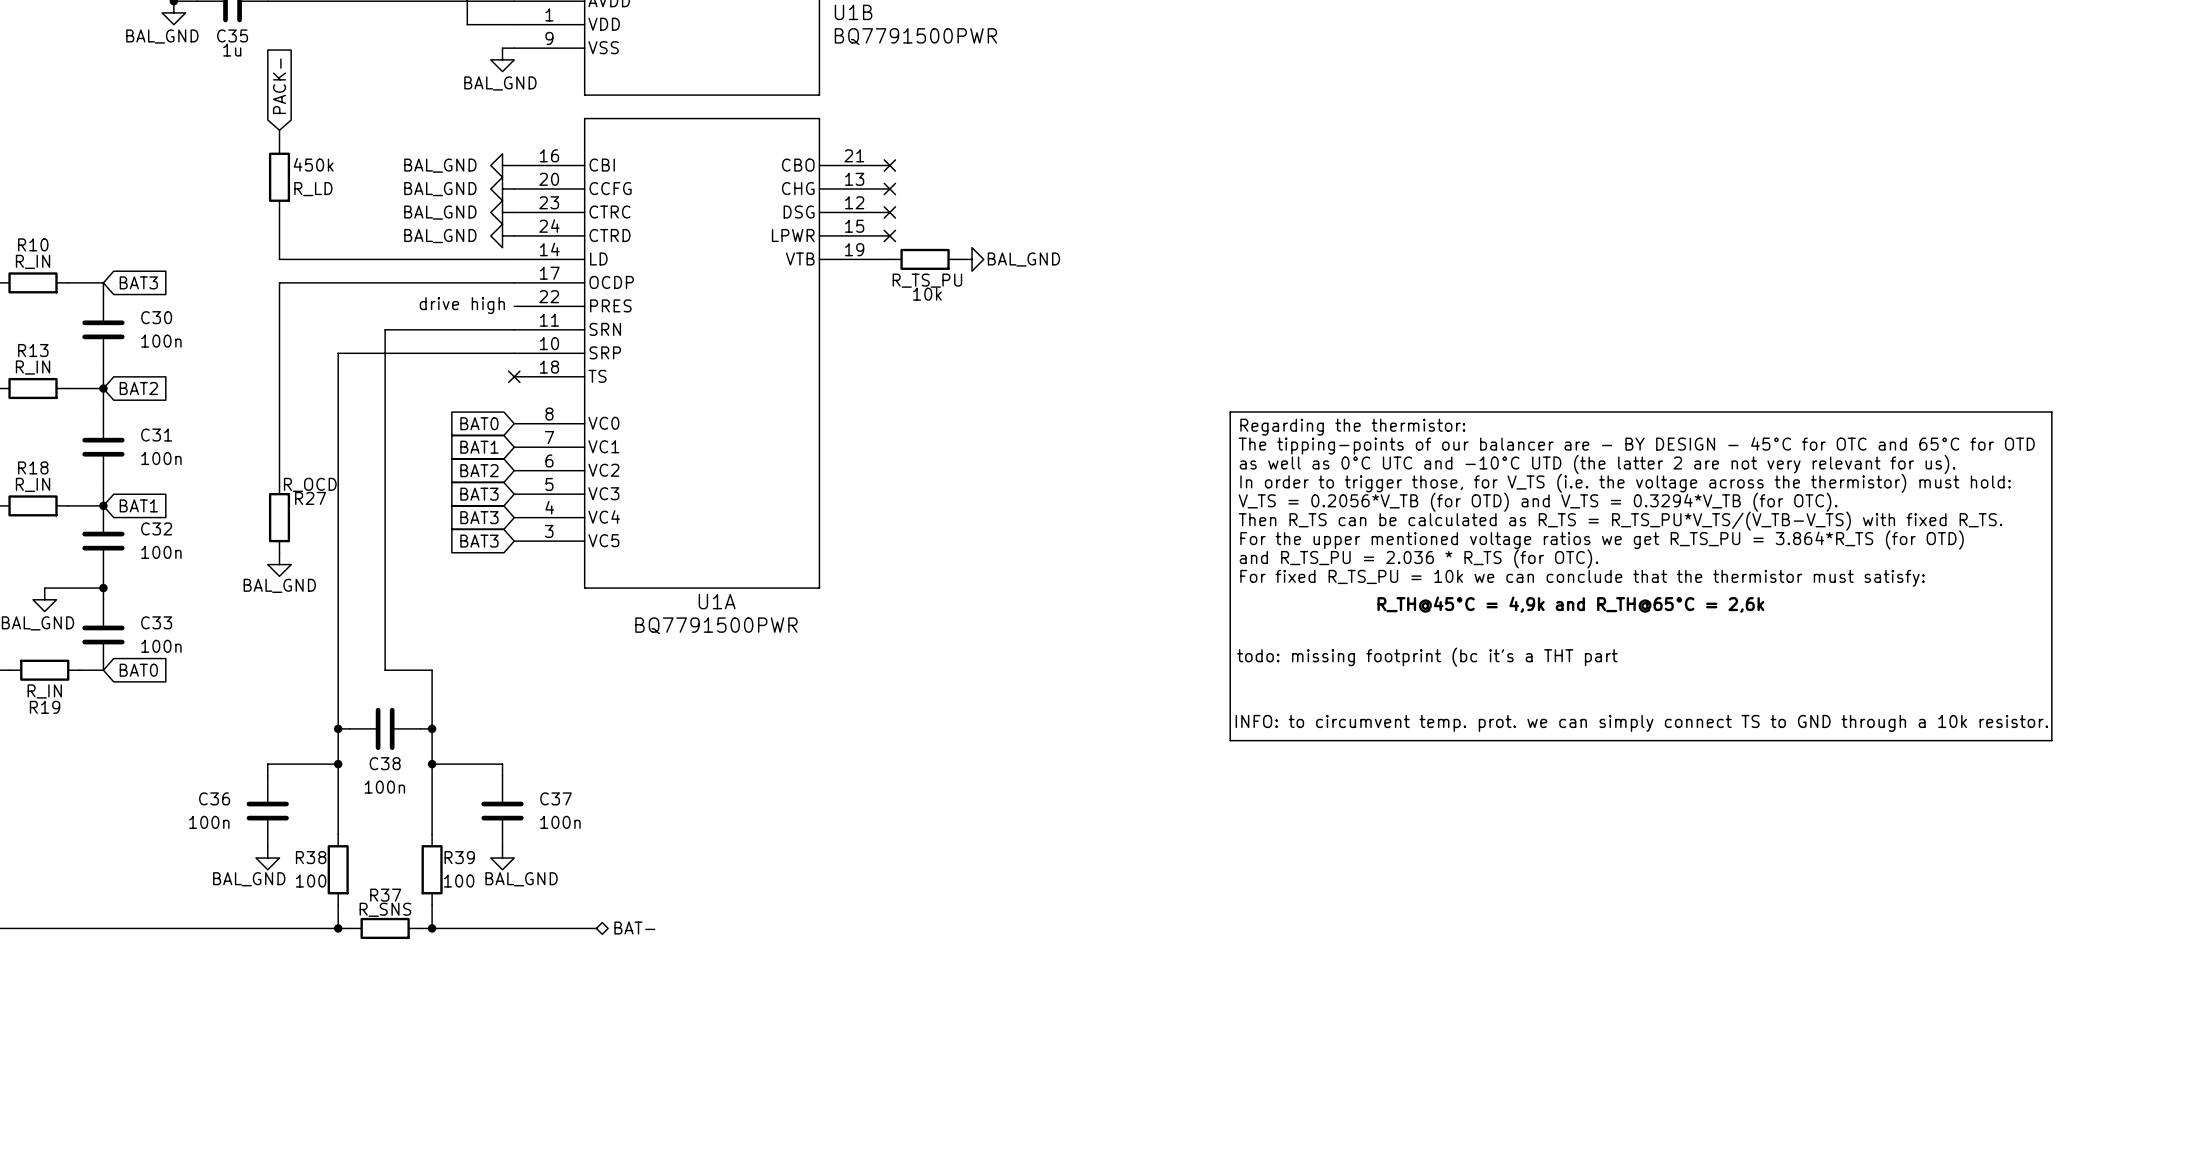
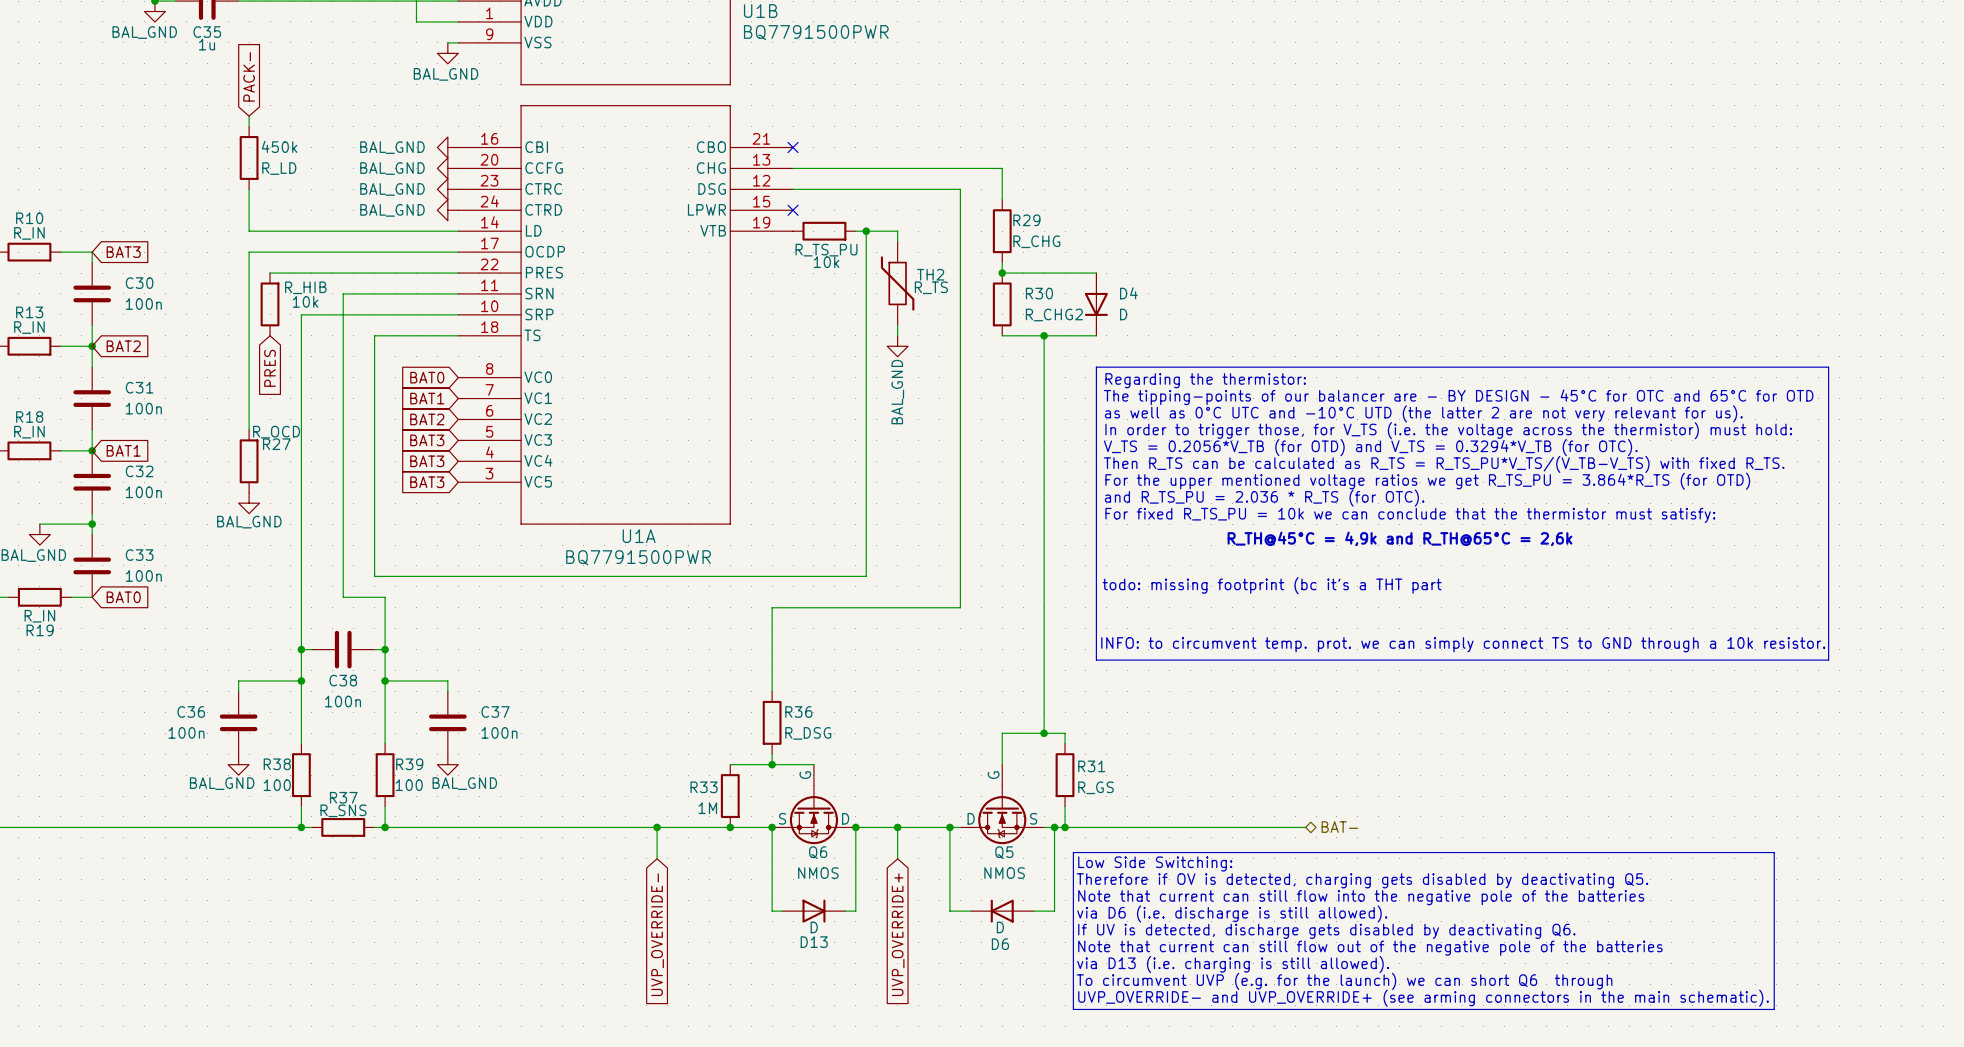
wire: none -> (793, 168) (1002, 168) (1002, 199)
no-connect mark: (889, 188) -> none
wire: none -> (793, 189) (960, 189) (960, 607) (772, 607) (772, 691)
no-connect mark: (889, 212) -> none
wire: none -> (855, 231) (897, 231) (897, 241)
wire: none -> (866, 231) (866, 576) (374, 576) (374, 335) (458, 335)
power symbol rotation: 0° (972, 259) -> 90° clockwise (897, 346)
power symbol position: BAL_GND (972, 259) -> BAL_GND (897, 346)
junction: none -> (866, 231)
R29: none -> R_CHG (1002, 231)
wire: none -> (1002, 262) (1002, 273) (1096, 273)
text: drive high (462, 305) -> none
wire: none -> (270, 273) (458, 273)
junction: none -> (1002, 273)
TH2: none -> R_TS (897, 283)
R_HIB: none -> 10k (270, 304)
R30: none -> R_CHG2 (1002, 304)
D4: none -> D (1096, 304)
wire: none -> (897, 325) (897, 335)
no-connect mark: (514, 376) -> none
wire: none -> (1002, 335) (1096, 335)
wire: none -> (1044, 335) (1044, 733)
junction: none -> (1044, 335)
global label: none -> PRES (270, 368)
R36: none -> R_DSG (772, 722)
junction: none -> (1044, 733)
wire: none -> (1065, 743) (1065, 733) (1002, 733) (1002, 764)
wire: none -> (772, 754) (772, 764)
wire: none -> (730, 764) (813, 764)
junction: none -> (772, 764)
R31: none -> R_GS (1065, 775)
R33: none -> 1M (730, 796)
Q6: none -> NMOS (813, 804)
Q5: none -> NMOS (1002, 804)
wire: none -> (1065, 806) (1065, 827)
wire: none -> (531, 827) (772, 827) (772, 911) (782, 911)
hierarchical label: BAT- (634, 928) -> none
wire: none -> (657, 827) (657, 858)
junction: none -> (657, 827)
junction: none -> (730, 827)
junction: none -> (772, 827)
junction: none -> (855, 827)
wire: none -> (897, 827) (897, 858)
junction: none -> (897, 827)
wire: none -> (949, 827) (949, 911) (970, 911)
junction: none -> (949, 827)
wire: none -> (960, 827) (855, 827) (855, 911) (845, 911)
wire: none -> (1044, 827) (1305, 827)
wire: none -> (1054, 827) (1054, 911) (1033, 911)
junction: none -> (1054, 827)
junction: none -> (1065, 827)
hierarchical label: none -> BAT- (1339, 827)
line: none -> (1073, 852) (1774, 852) (1774, 1009) (1073, 1009) (1073, 852)
text: none -> Low Side Switching: (1155, 863)
text: none -> Therefore if OV is detected, charging gets disabled by deactivating Q5. (1362, 880)
text: none -> Note that current can still flow into the negative pole of the batteries (1361, 897)
D13: none -> D (813, 911)
D6: none -> D (1002, 911)
text: none -> via D6 (i.e. discharge is still allowed). (1232, 914)
text: none -> If UV is detected, discharge gets disabled by deactivating Q6. (1326, 931)
global label: none -> UVP_OVERRIDE- (657, 934)
global label: none -> UVP_OVERRIDE+ (898, 934)
text: none -> Note that current can still flow out of the negative pole of the batteries (1370, 948)
text: none -> via D13 (i.e. charging is still allowed). (1233, 964)
text: none -> To circumvent UVP (e.g. for the launch) we can short Q6 through (1344, 981)
text: none -> UVP_OVERRIDE- and UVP_OVERRIDE+ (see arming connectors in the main schematic). (1423, 998)

